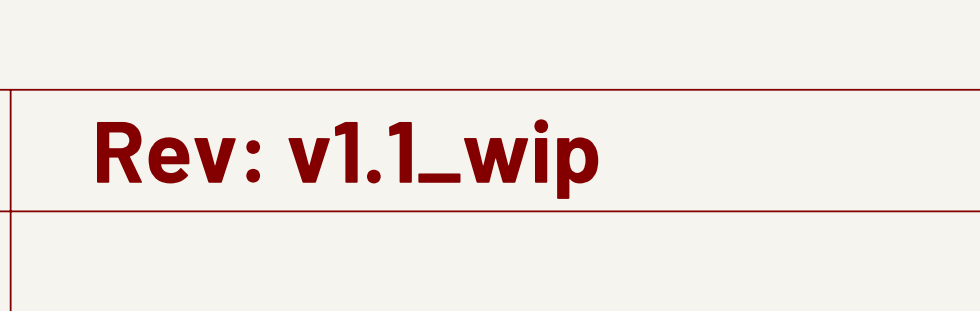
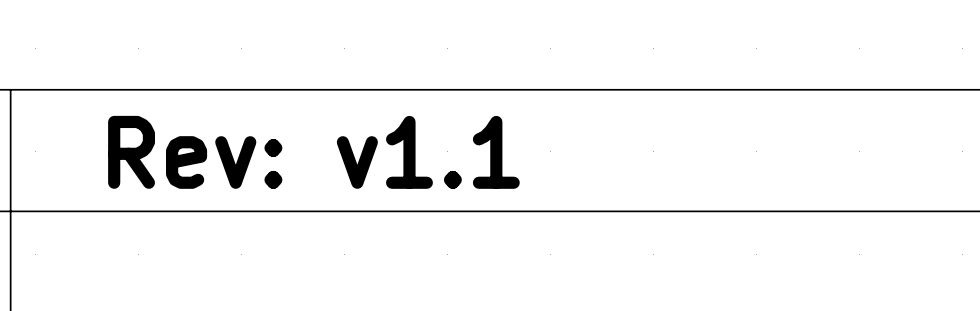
title block: Rev: v1.1_wip (347, 159) -> Rev: v1.1 (313, 152)

